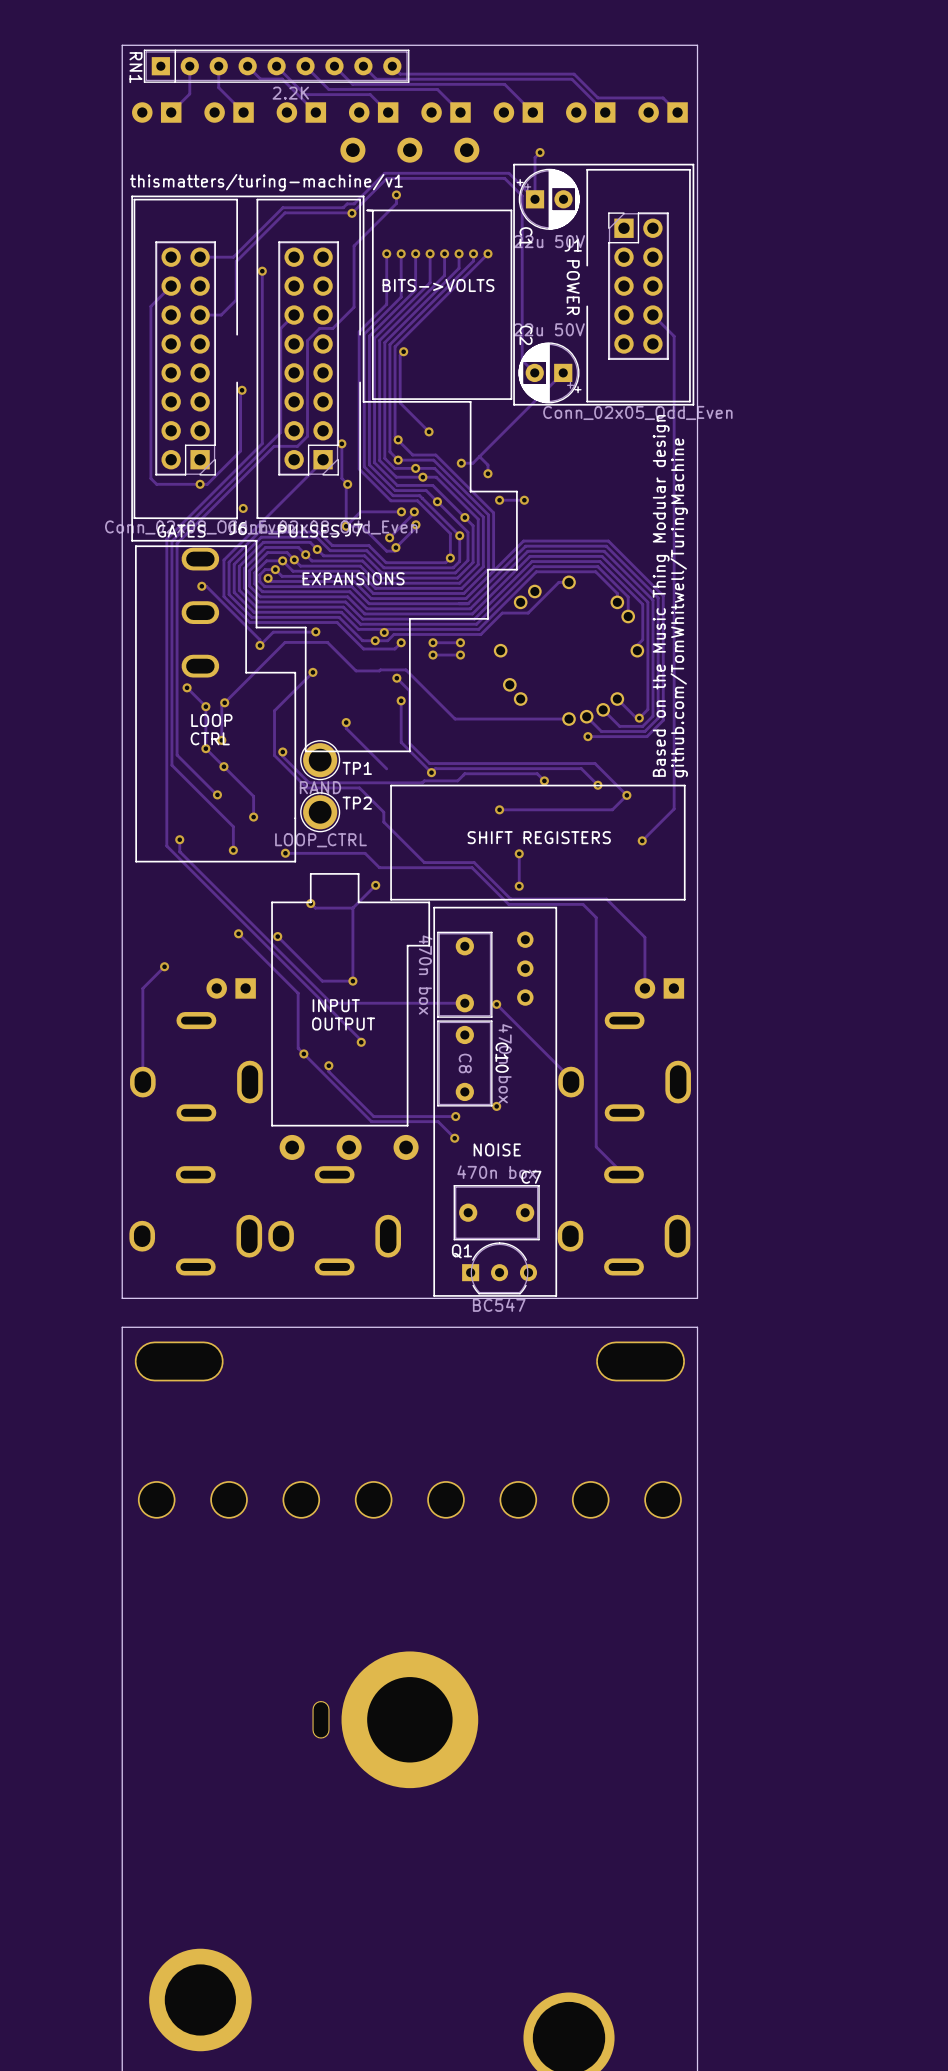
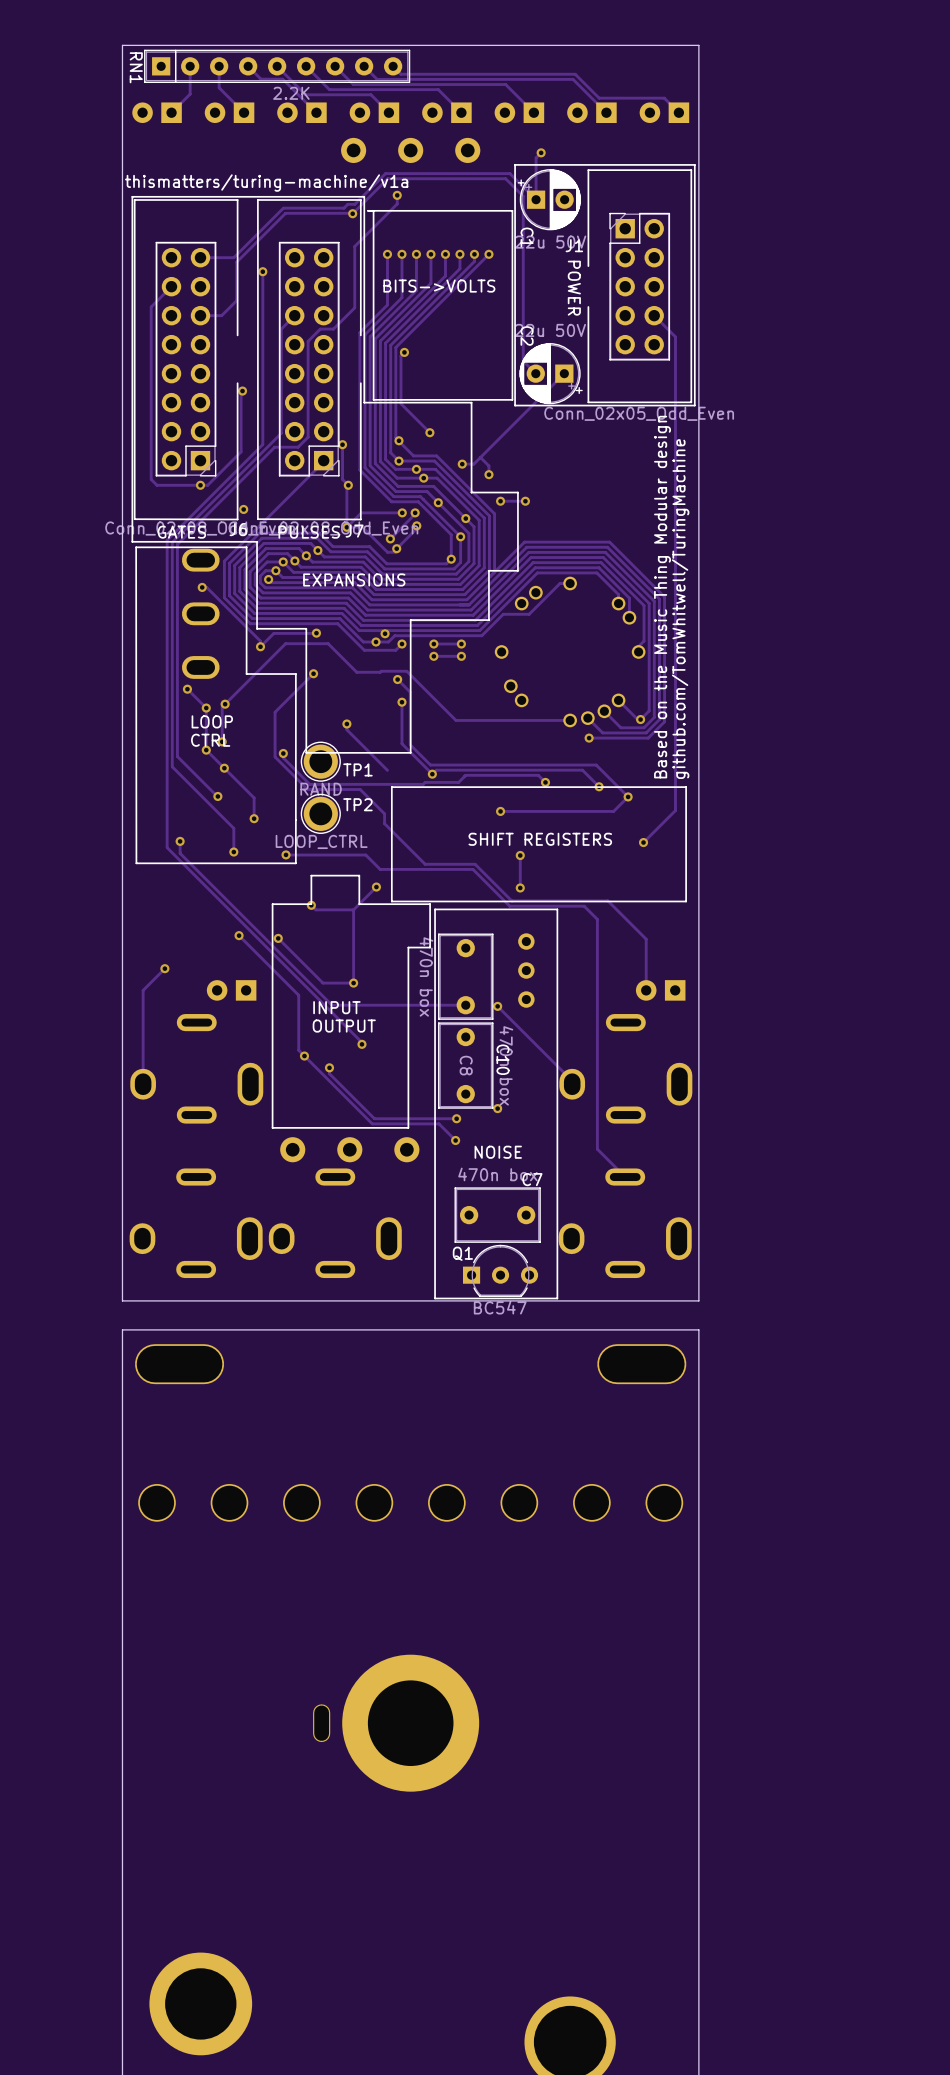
text: thismatters/turing-machine/v1 (266, 182) -> thismatters/turing-machine/v1a (266, 183)

